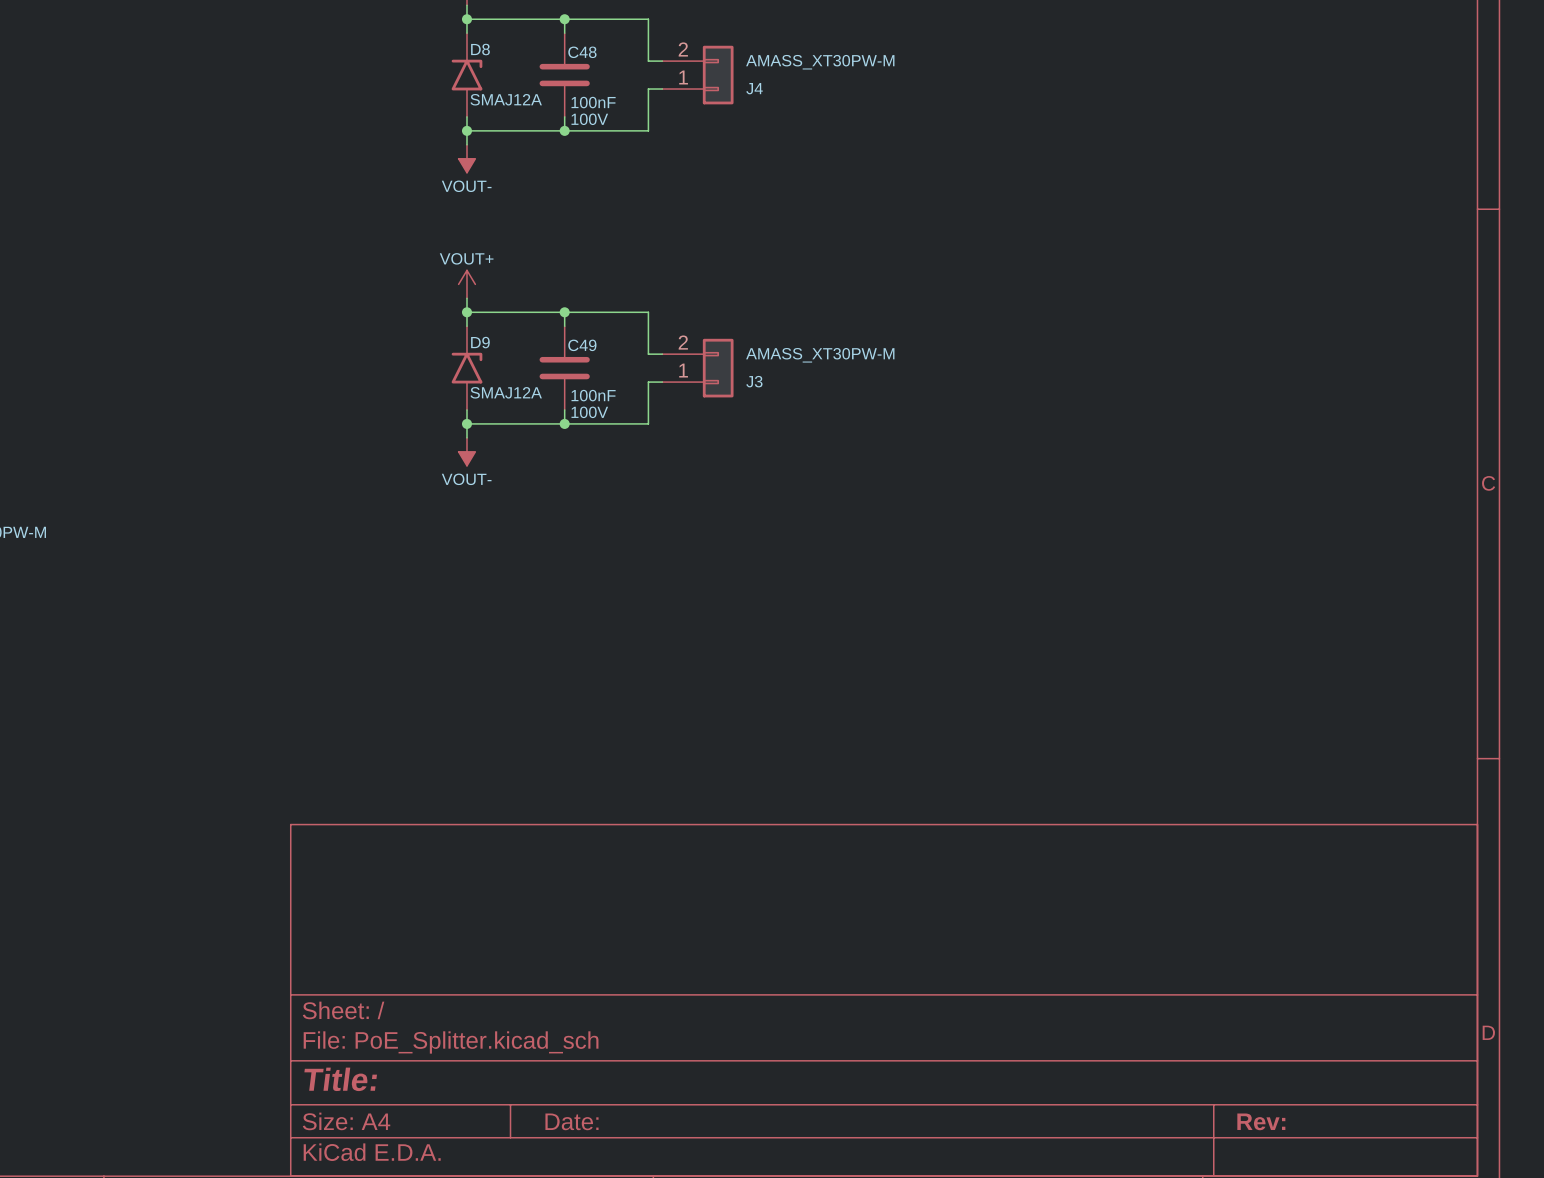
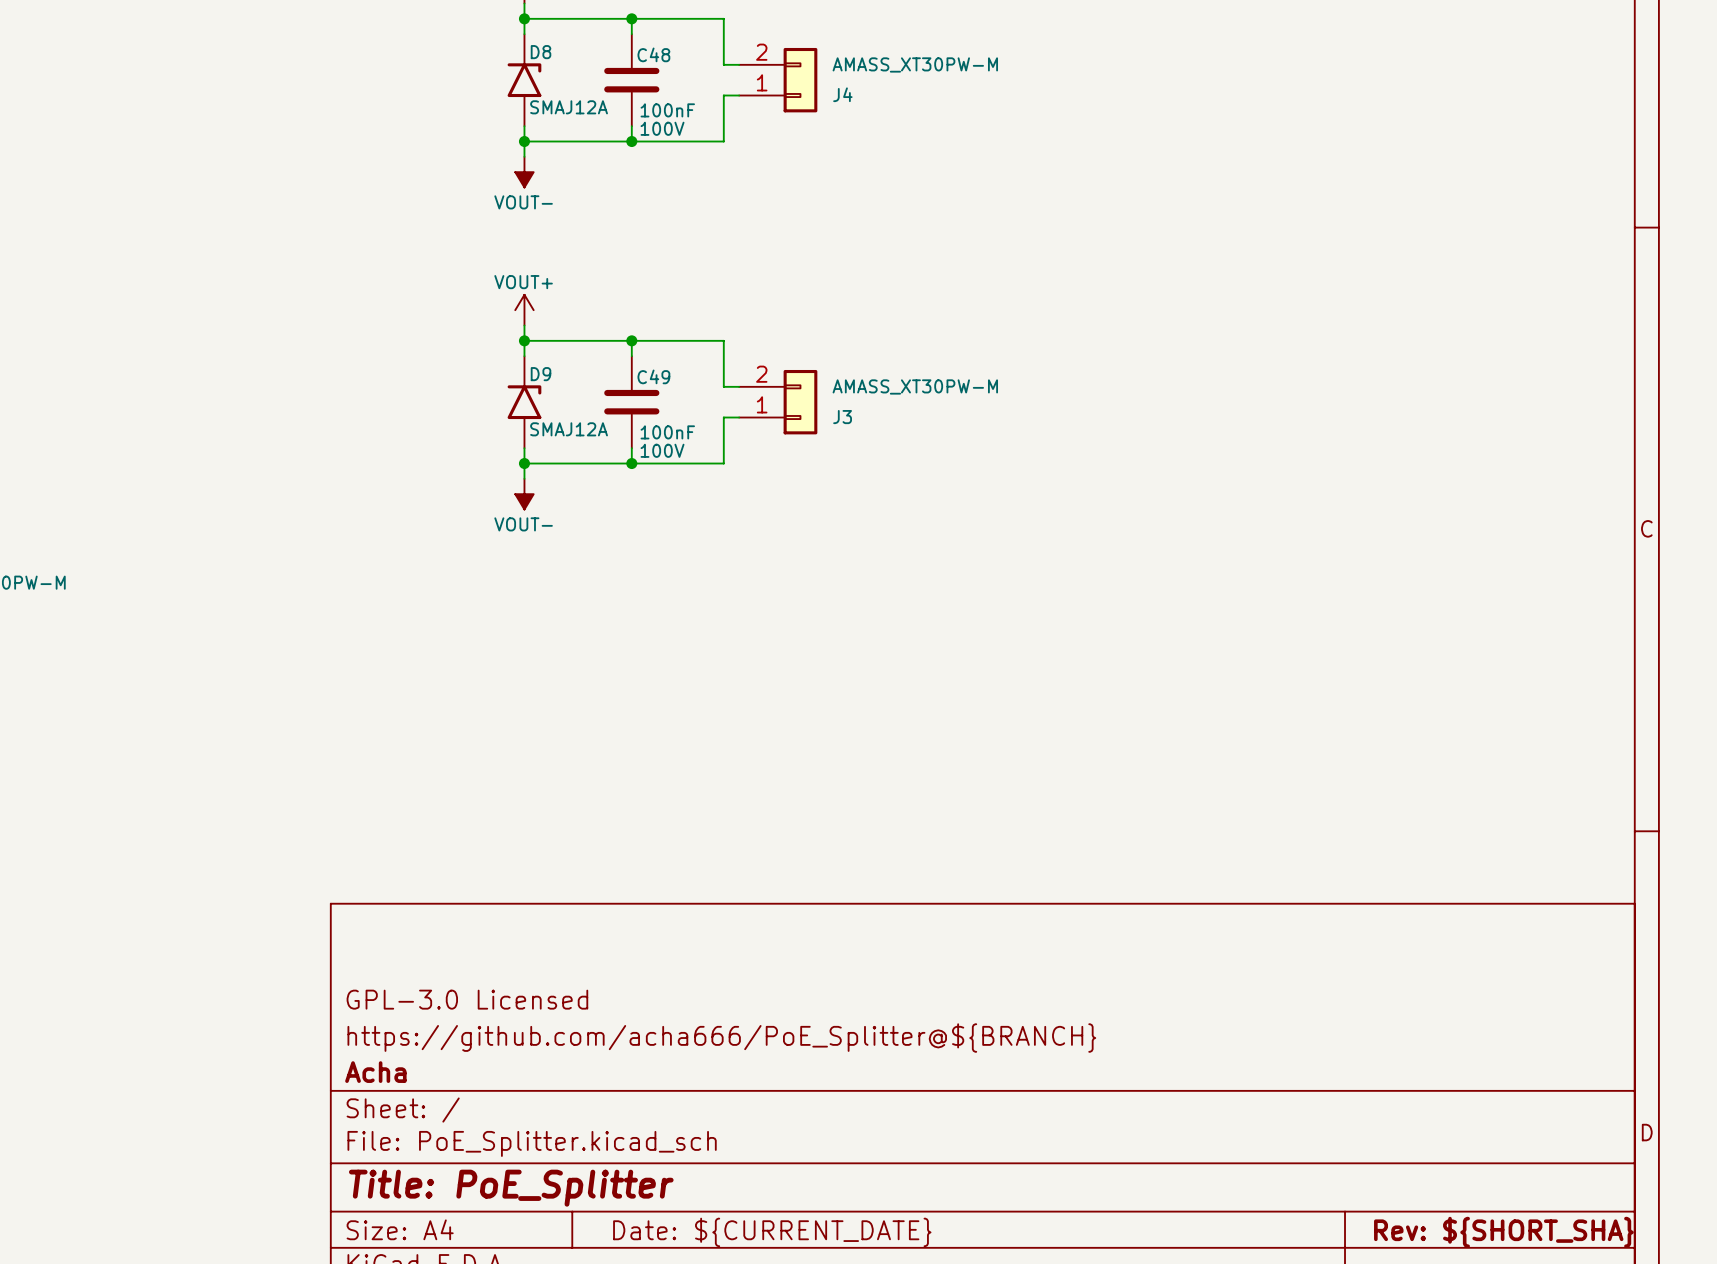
title block: none -> GPL-3.0 Licensed (467, 999)
title block: none -> https://github.com/acha666/PoE_Splitter@${BRANCH} (721, 1038)
title block: none -> Acha (375, 1072)
title block: Title: (340, 1079) -> Title: PoE_Splitter (511, 1188)
title block: Date: (571, 1121) -> Date: ${CURRENT_DATE} (772, 1232)
title block: Rev: (1261, 1121) -> Rev: ${SHORT_SHA} (1503, 1232)

